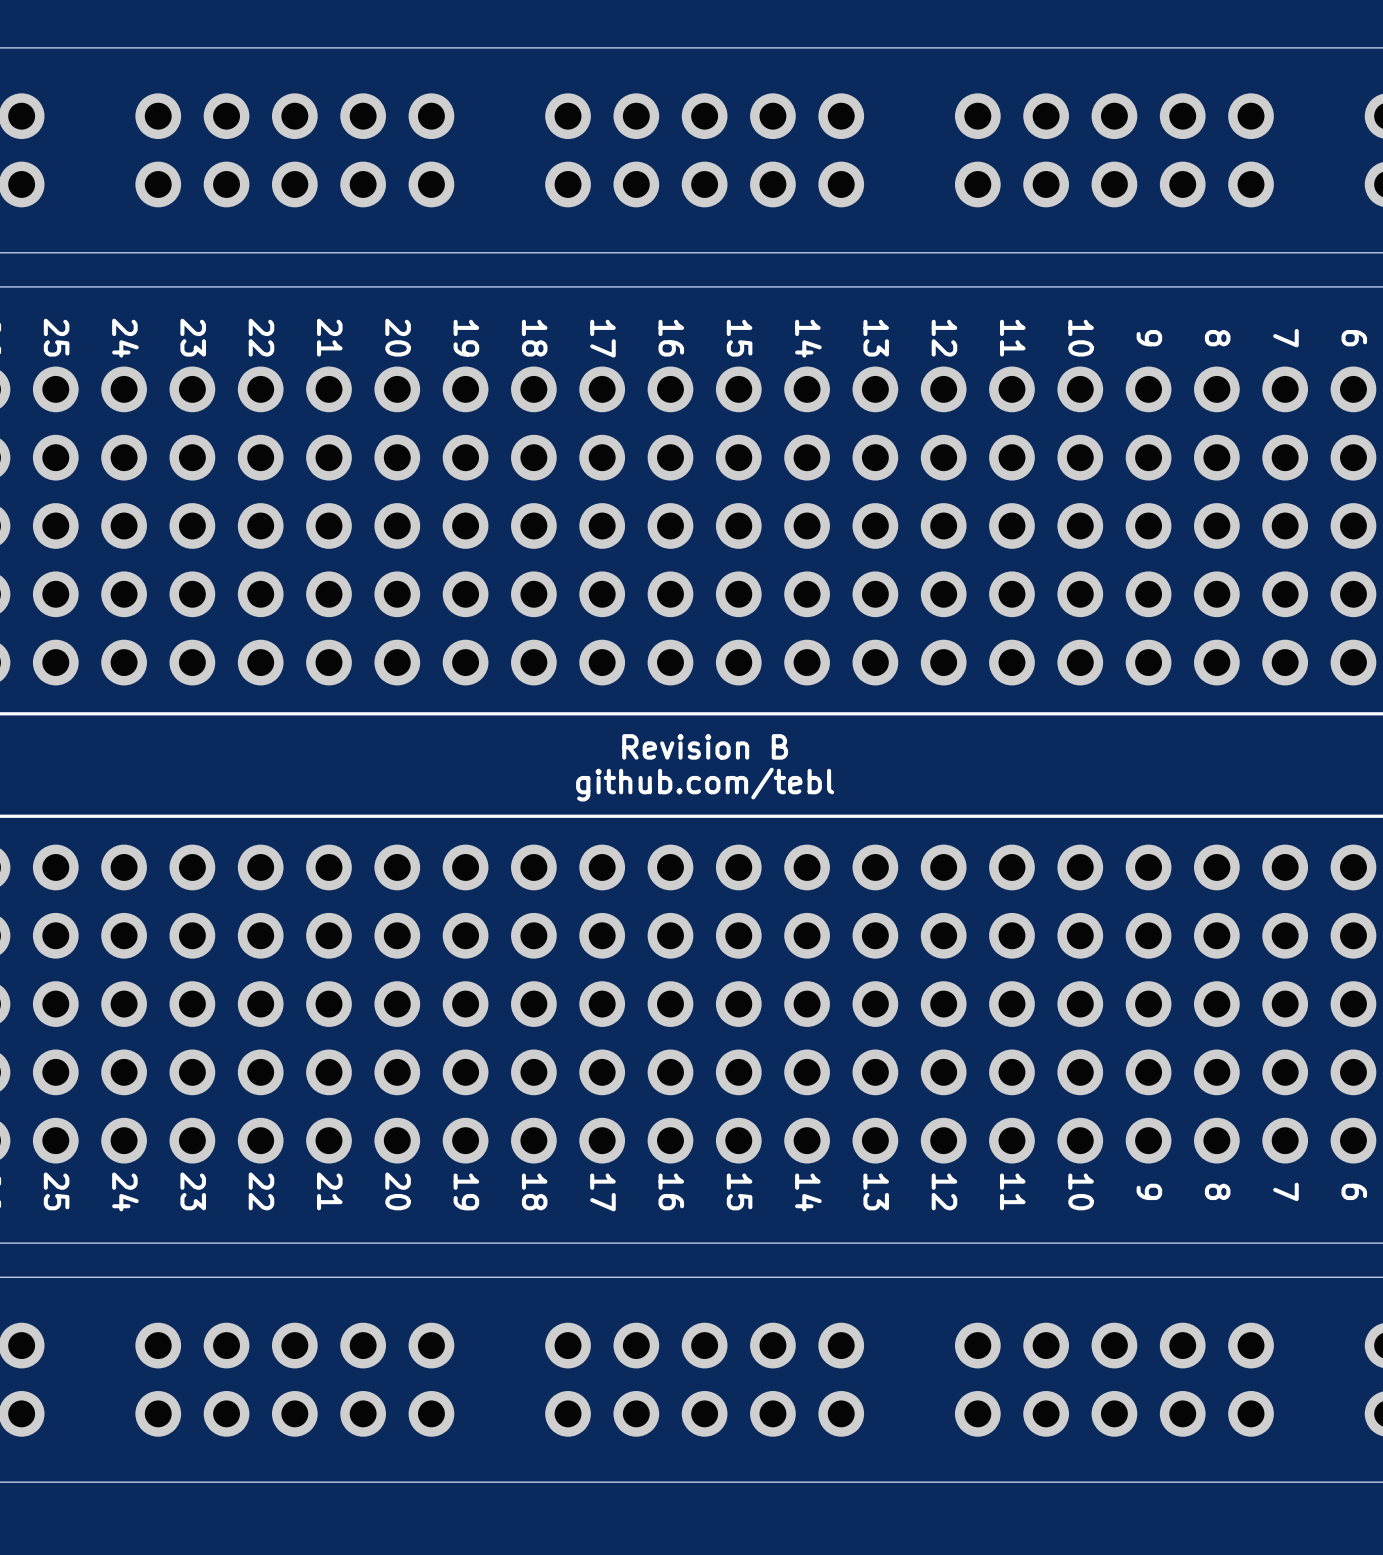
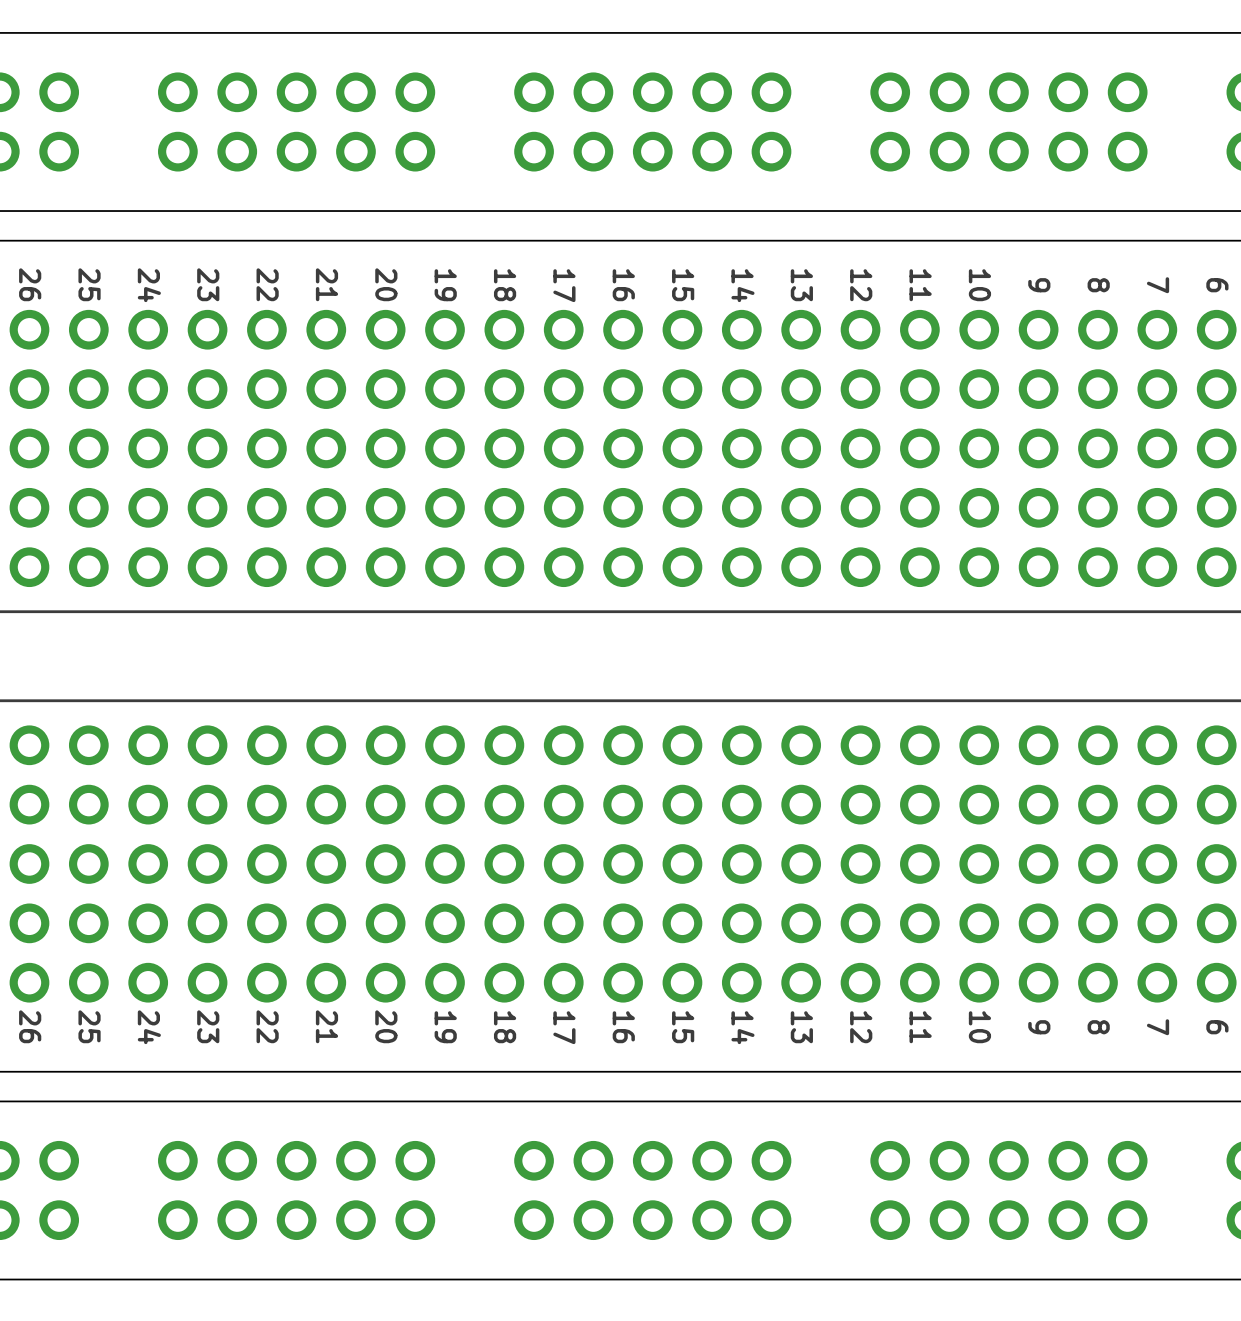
text: Revision B (705, 746) -> none
text: github.com/tebl (705, 784) -> none

